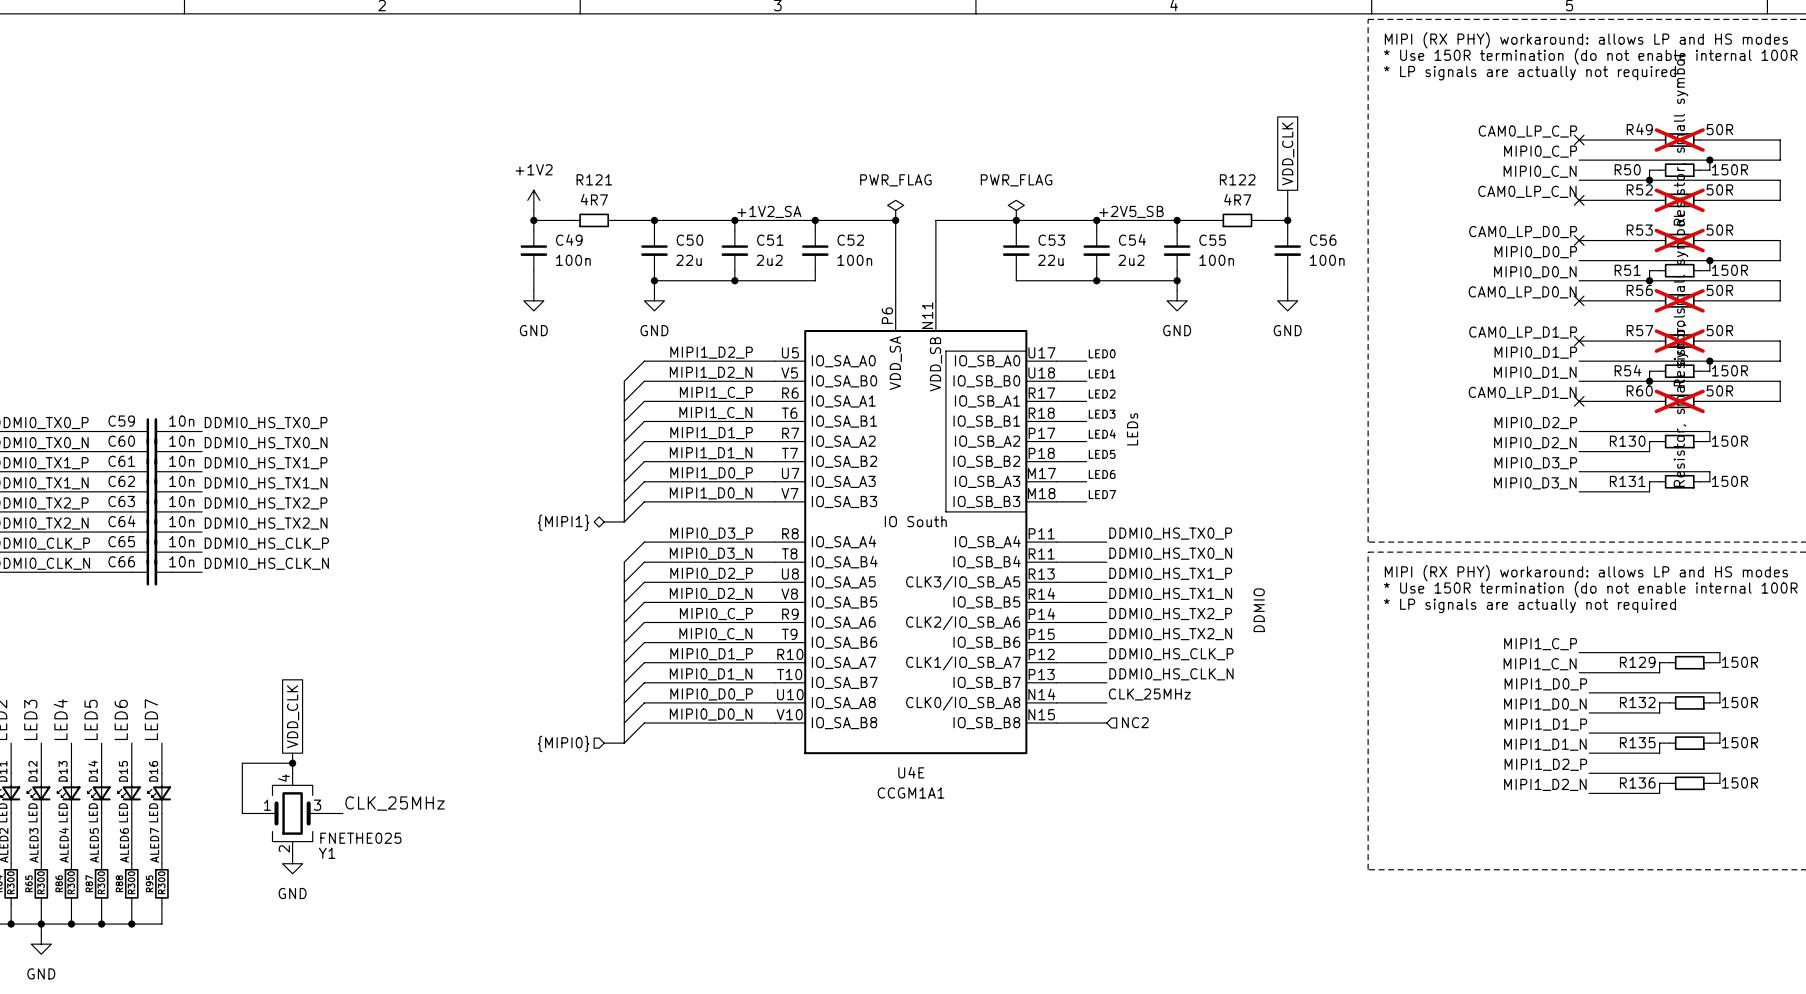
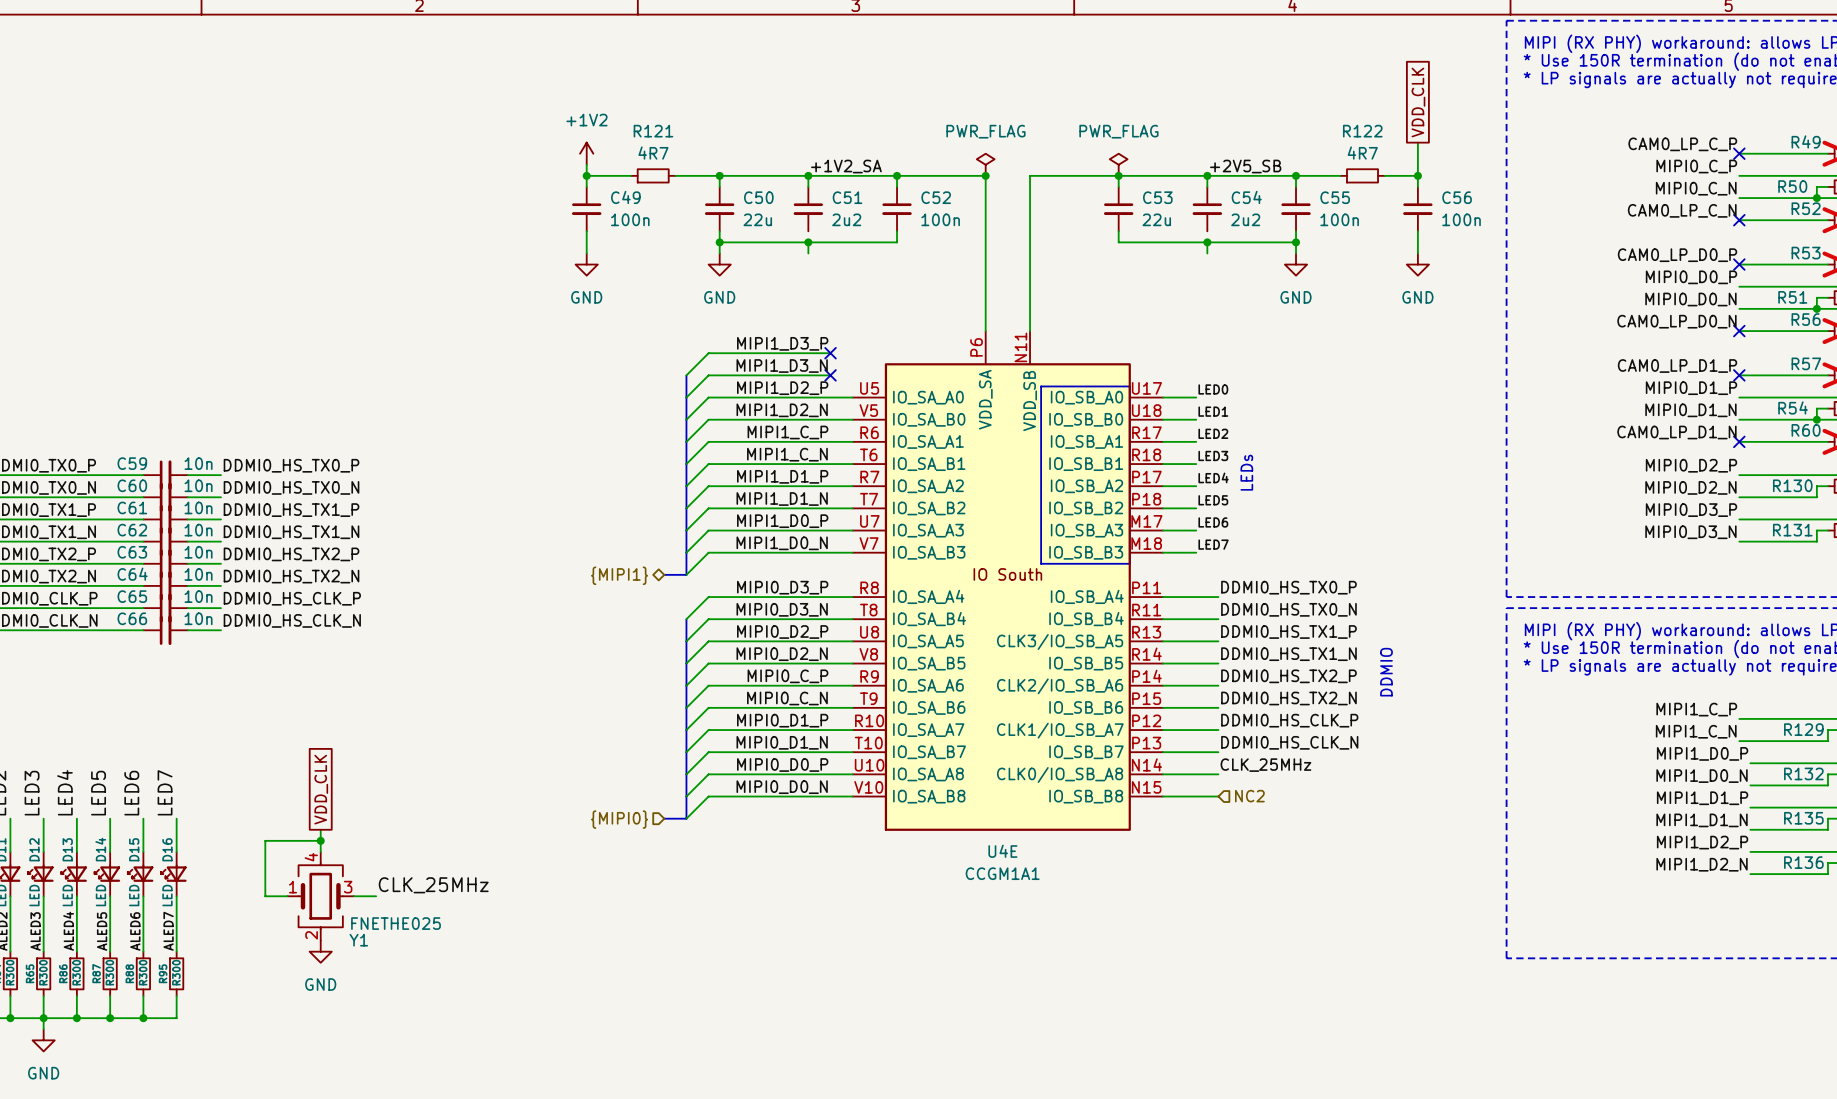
wire: none -> (1417, 142) (1417, 186)
global label position: VDD_CLK (1288, 153) -> VDD_CLK (1418, 102)
junction: none -> (586, 175)
wire: none -> (719, 175) (719, 186)
junction: none -> (719, 175)
wire: none -> (808, 175) (808, 186)
junction: none -> (808, 175)
wire: none -> (897, 175) (897, 186)
junction: none -> (897, 175)
junction: none -> (985, 175)
wire: none -> (1118, 175) (1118, 186)
junction: none -> (1118, 175)
wire: none -> (1207, 175) (1207, 186)
junction: none -> (1207, 175)
wire: none -> (1296, 175) (1296, 186)
junction: none -> (1296, 175)
junction: none -> (1417, 175)
power symbol position: +1V2 (533, 200) -> +1V2 (586, 153)
power symbol position: PWR_FLAG (895, 210) -> PWR_FLAG (985, 164)
power symbol position: PWR_FLAG (1016, 210) -> PWR_FLAG (1118, 164)
label position: +1V2_SA (769, 211) -> +1V2_SA (846, 166)
label position: +2V5_SB (1131, 211) -> +2V5_SB (1245, 166)
wire: (533, 220) (574, 220) -> (586, 175) (631, 175)
junction: (533, 220) -> none
R121 position: (594, 220) -> (653, 175)
wire: (614, 220) (654, 220) -> (719, 231) (719, 242)
junction: (815, 220) -> none
wire: (895, 220) (815, 220) (815, 230) -> (985, 242) (985, 175) (675, 175)
junction: (895, 220) -> none
wire: (935, 220) (1016, 220) (1016, 230) -> (1030, 242) (1030, 175) (1340, 175)
junction: (1016, 220) -> none
wire: (1177, 220) (1217, 220) -> (1296, 242) (1296, 231)
R122 position: (1237, 220) -> (1362, 175)
wire: (1257, 220) (1287, 220) -> (1384, 175) (1417, 175)
junction: (1287, 220) -> none
C49 position: (533, 250) -> (586, 209)
C50 position: (654, 250) -> (719, 209)
C51 position: (734, 250) -> (808, 209)
C52 position: (815, 250) -> (897, 209)
C53 position: (1016, 250) -> (1118, 209)
C54 position: (1096, 250) -> (1207, 209)
C55 position: (1177, 250) -> (1296, 209)
C56 position: (1287, 250) -> (1417, 209)
wire: (533, 270) (533, 290) -> (586, 164) (586, 186)
wire: (654, 270) (654, 290) -> none
wire: (734, 270) (734, 280) -> (897, 231) (897, 242)
wire: (815, 270) (815, 280) (654, 280) -> none
wire: (1016, 270) (1016, 280) (1177, 280) -> none
wire: (1177, 270) (1177, 290) -> none
wire: (1287, 270) (1287, 290) -> none
junction: (654, 280) -> none
junction: (734, 280) -> none
junction: (1096, 280) -> none
junction: (1177, 280) -> none
power symbol position: GND (533, 300) -> GND (586, 264)
power symbol position: GND (654, 300) -> GND (719, 264)
power symbol position: GND (1177, 300) -> GND (1296, 264)
power symbol position: GND (1287, 300) -> GND (1417, 264)
label: none -> MIPI1_D3_P (782, 343)
wire: none -> (830, 353) (708, 353) (686, 375)
no-connect mark: none -> (830, 353)
label: none -> MIPI1_D3_N (782, 366)
bus: none -> (686, 375) (686, 419)
wire: none -> (830, 375) (708, 375) (686, 397)
no-connect mark: none -> (830, 375)

